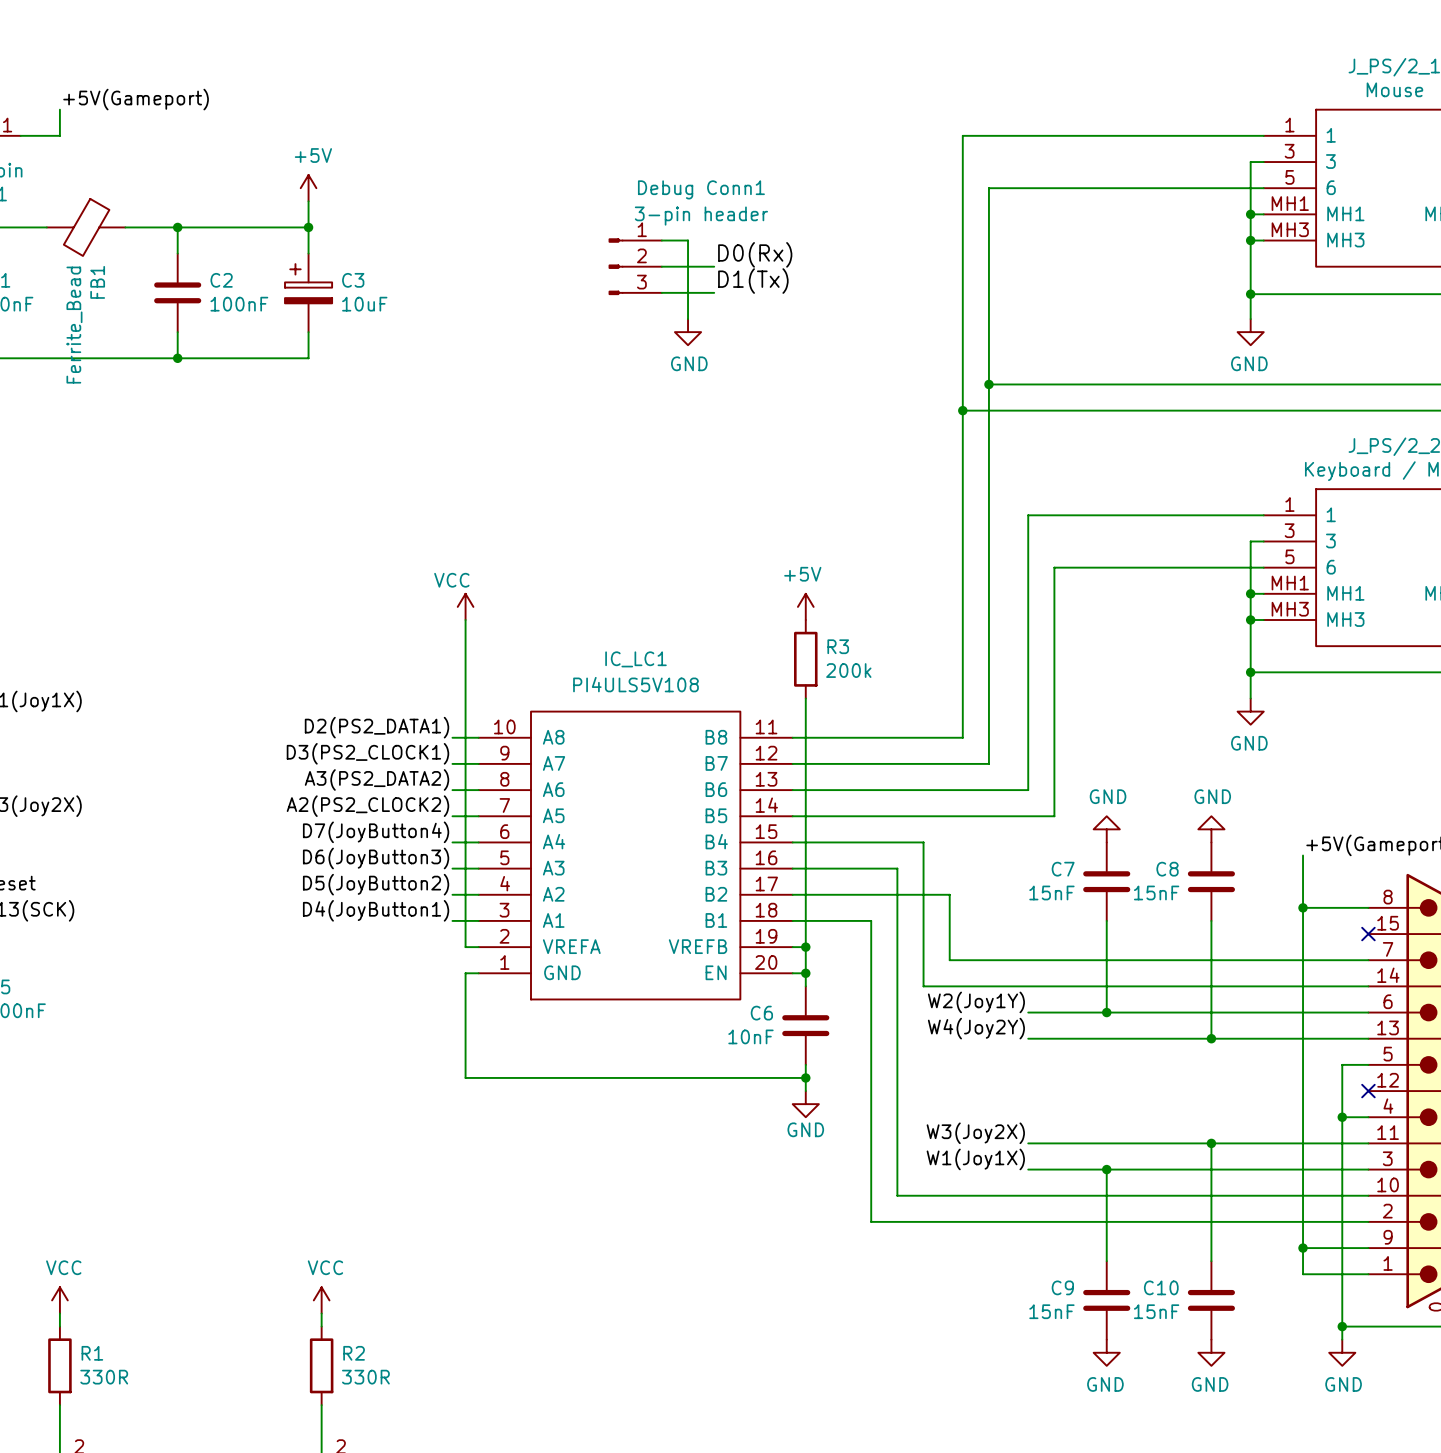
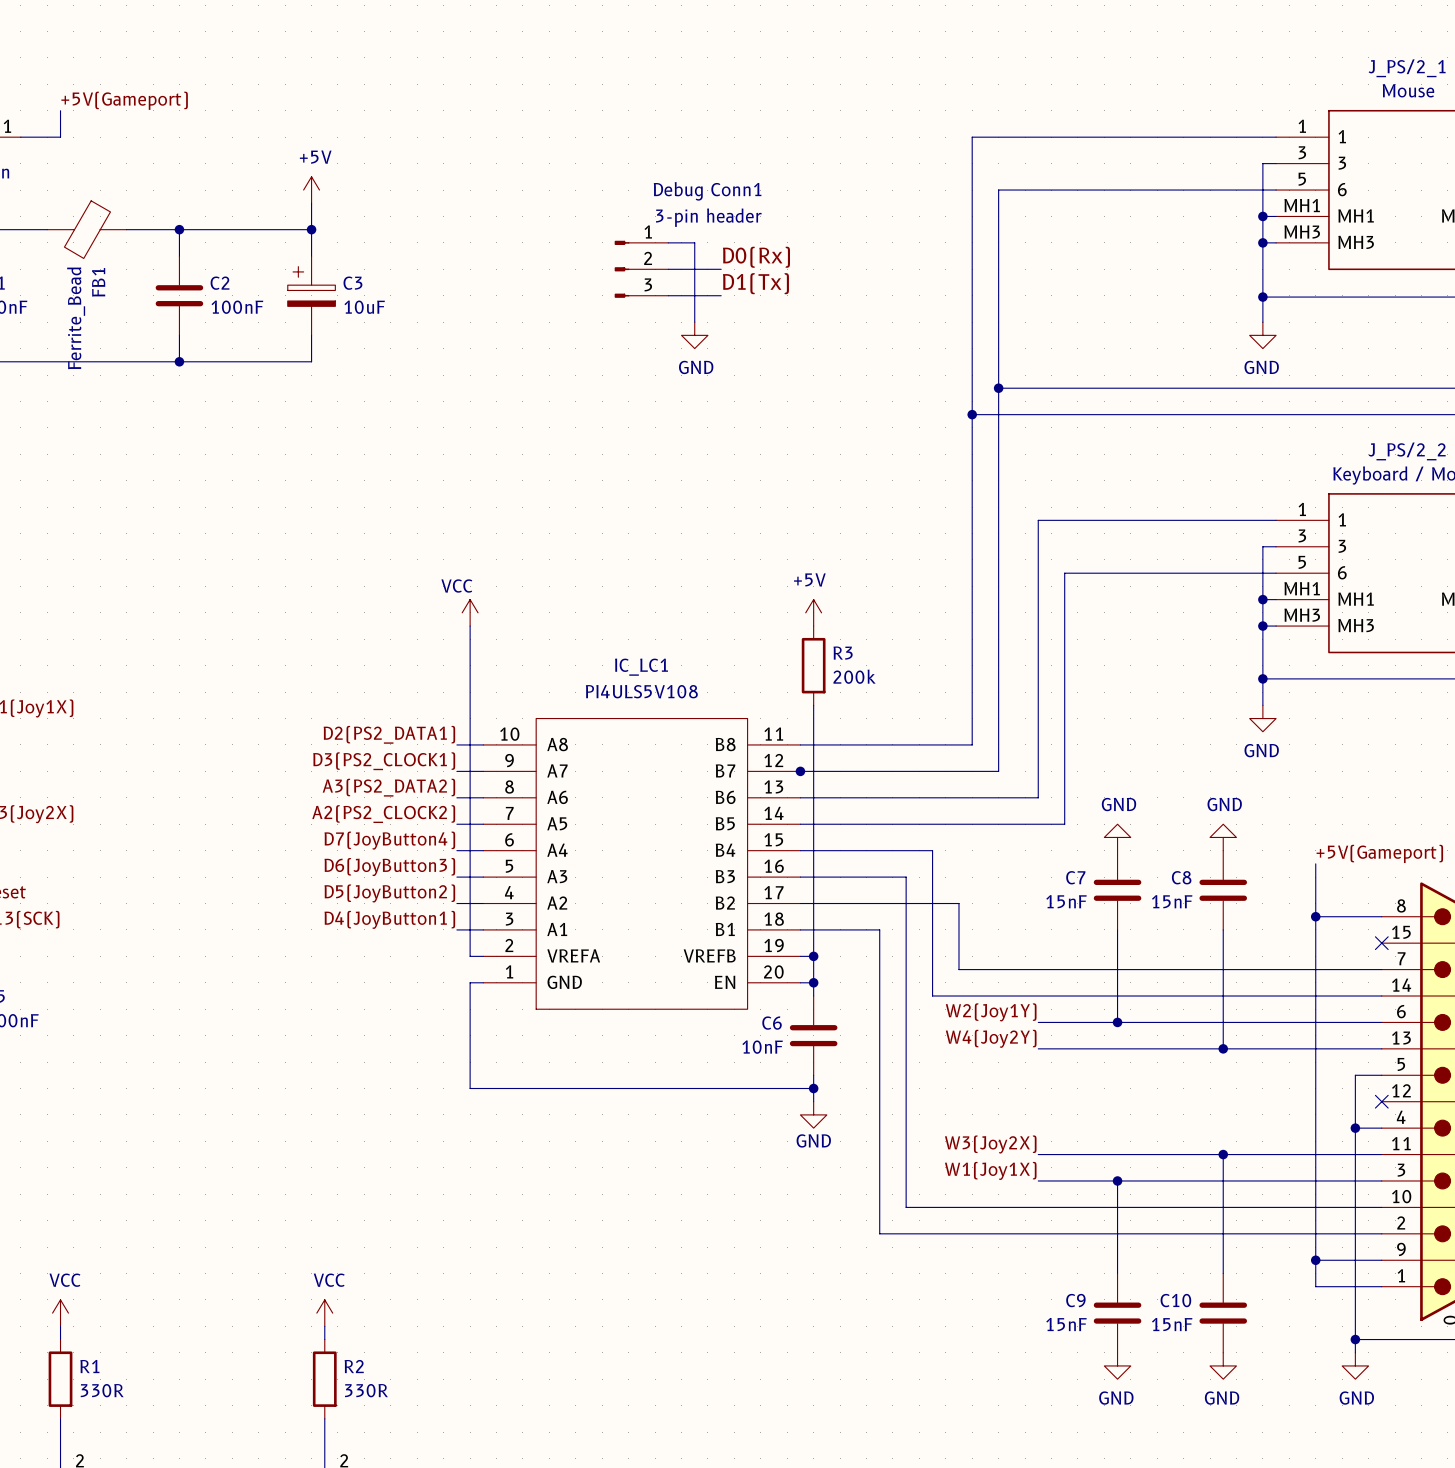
junction: none -> (800, 771)

